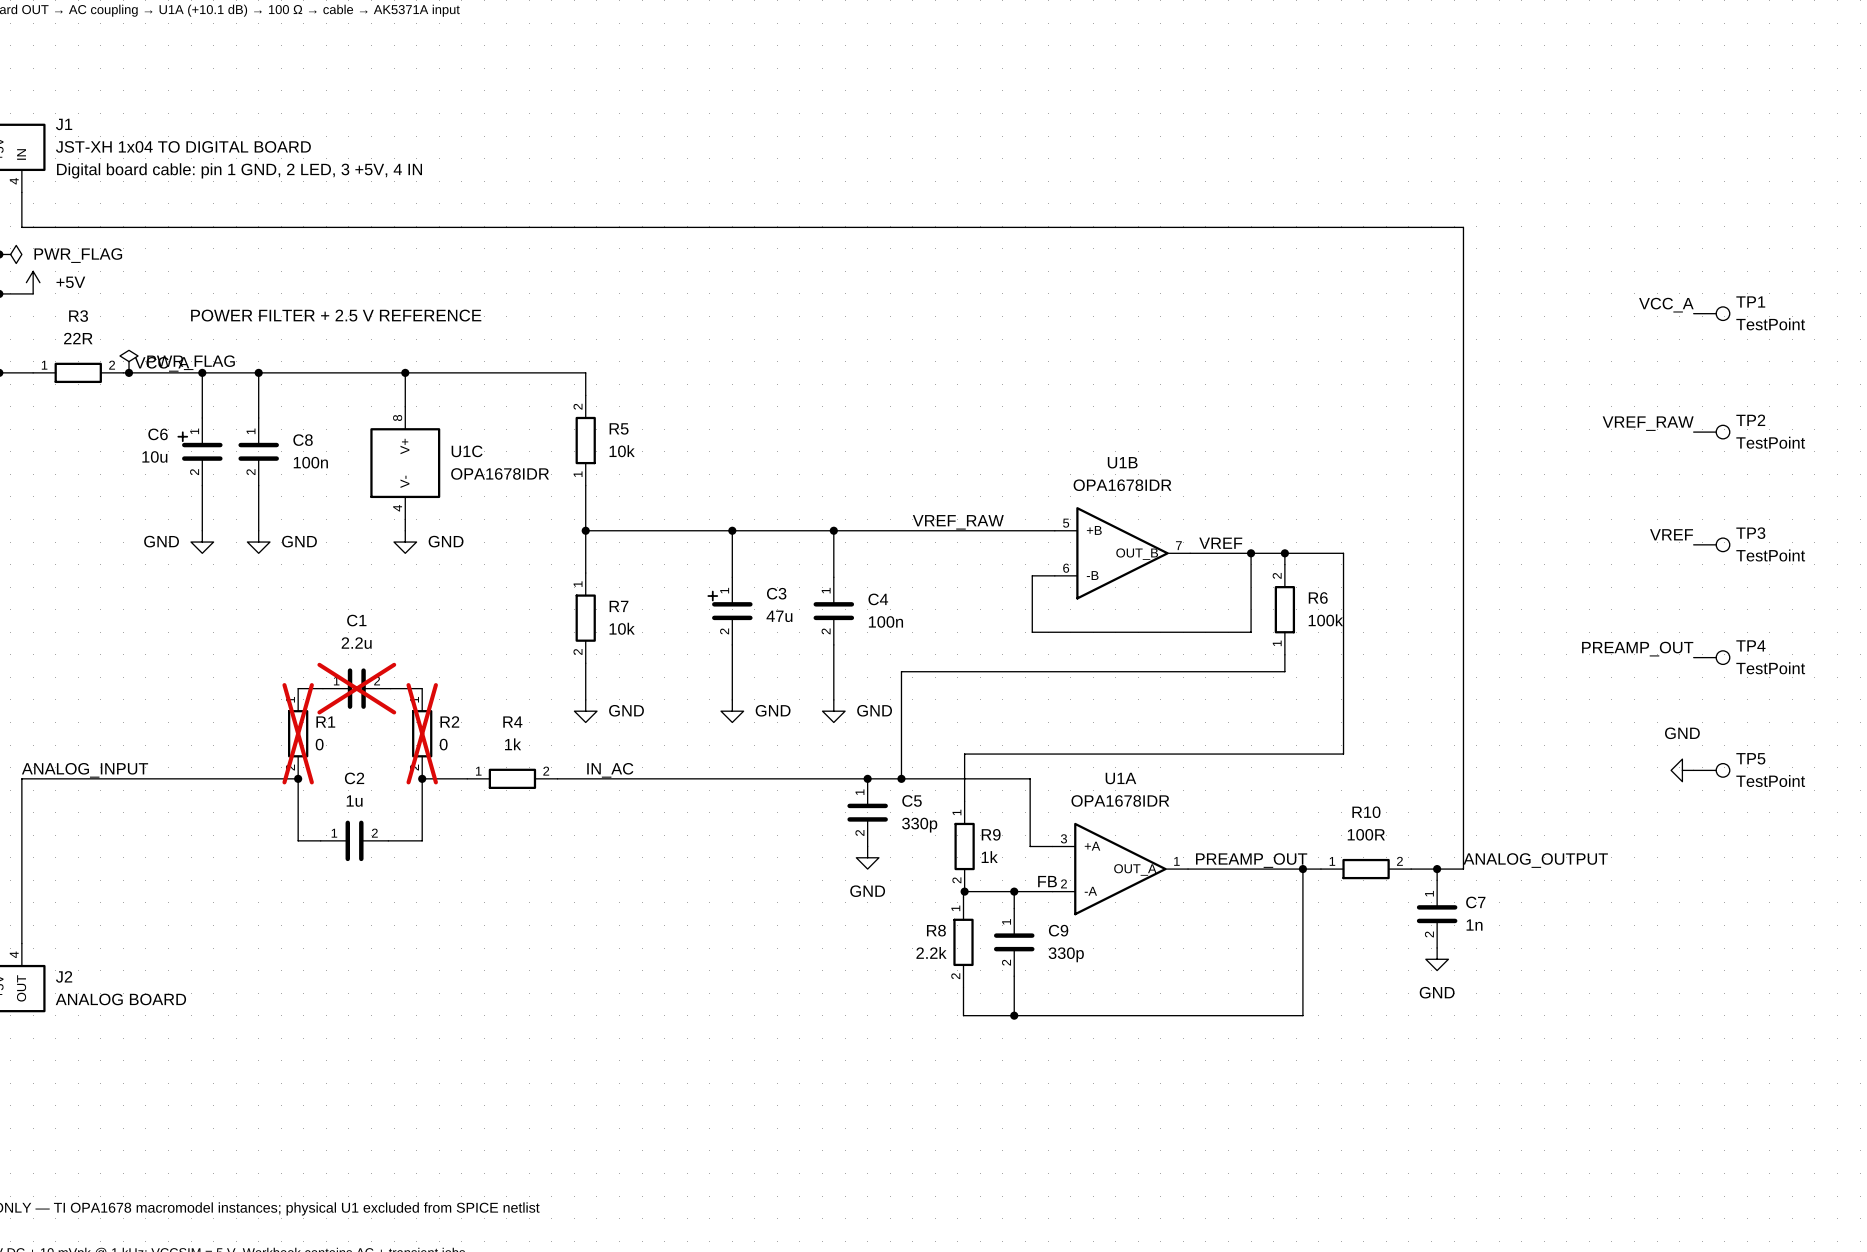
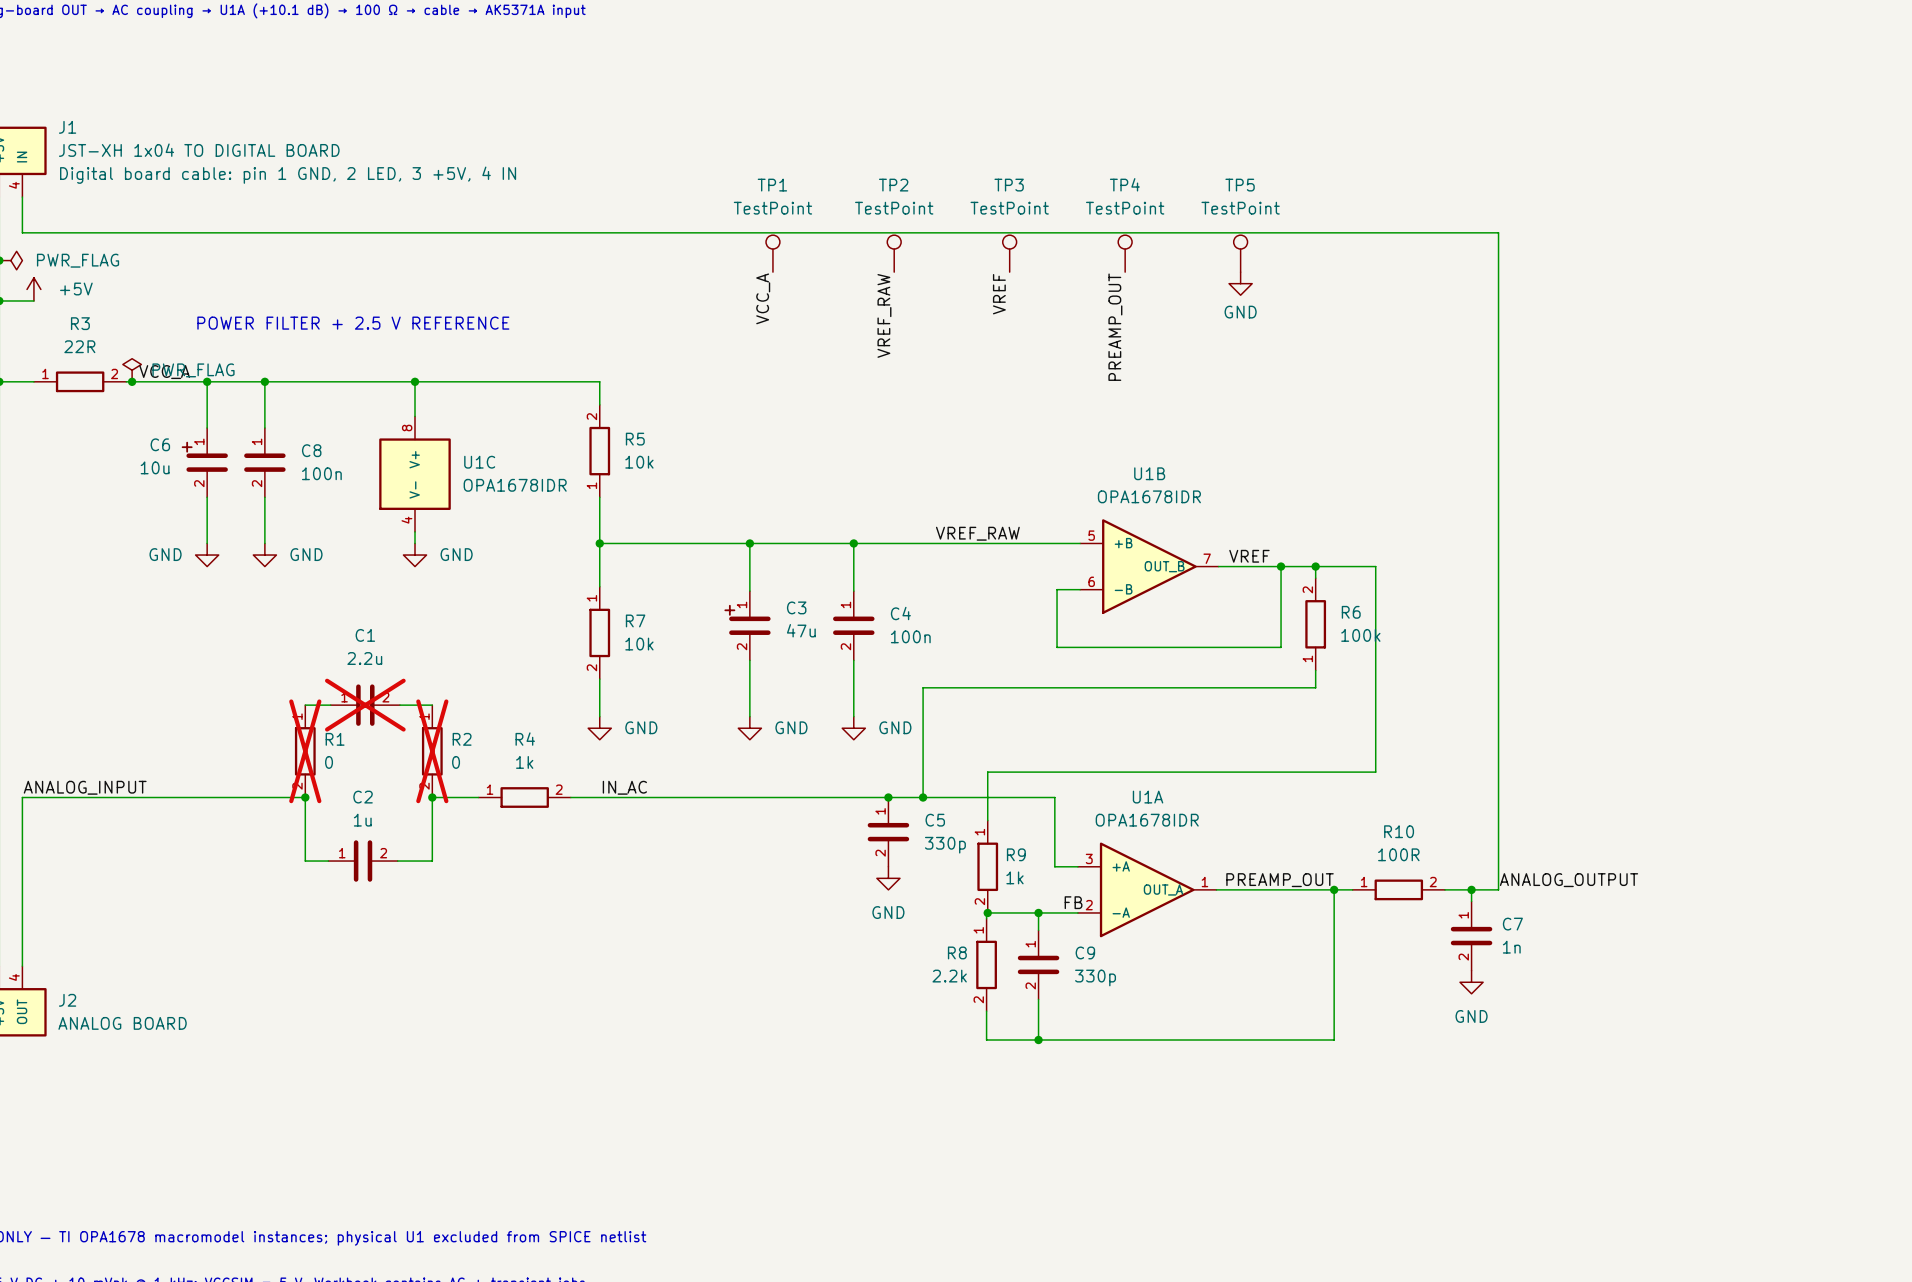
power symbol: none -> GND (1240, 283)
label: none -> VREF (999, 294)
label: none -> VCC_A (763, 298)
TP1 name position: TP1 (1750, 301) -> TP1 (772, 185)
label: VCC_A (1666, 305) -> none
label: none -> VREF_RAW (884, 315)
TP1 position: (1711, 313) -> (772, 253)
TP1 rotation: 0° (1722, 313) -> 90° counterclockwise (772, 242)
label: none -> PREAMP_OUT (1115, 327)
TP1 value position: TestPoint (1770, 324) -> TestPoint (772, 208)
TP2 name position: TP2 (1750, 420) -> TP2 (893, 185)
label: VREF_RAW (1648, 423) -> none
TP2 position: (1711, 432) -> (894, 253)
TP2 rotation: 0° (1722, 432) -> 90° counterclockwise (894, 242)
TP2 value position: TestPoint (1770, 442) -> TestPoint (894, 208)
TP3 name position: TP3 (1750, 533) -> TP3 (1009, 185)
label: VREF (1671, 534) -> none
TP3 position: (1711, 544) -> (1009, 253)
TP3 rotation: 0° (1722, 544) -> 90° counterclockwise (1009, 242)
TP3 value position: TestPoint (1770, 555) -> TestPoint (1009, 208)
TP4 name position: TP4 (1750, 645) -> TP4 (1124, 184)
label: PREAMP_OUT (1637, 649) -> none
TP4 position: (1711, 657) -> (1125, 253)
TP4 rotation: 0° (1722, 657) -> 90° counterclockwise (1125, 242)
TP4 value position: TestPoint (1770, 668) -> TestPoint (1125, 208)
TP5 name position: TP5 (1750, 758) -> TP5 (1240, 185)
power symbol: GND (1682, 770) -> none
TP5 position: (1711, 770) -> (1240, 253)
TP5 rotation: 0° (1722, 770) -> 90° counterclockwise (1240, 242)
TP5 value position: TestPoint (1770, 781) -> TestPoint (1240, 208)

